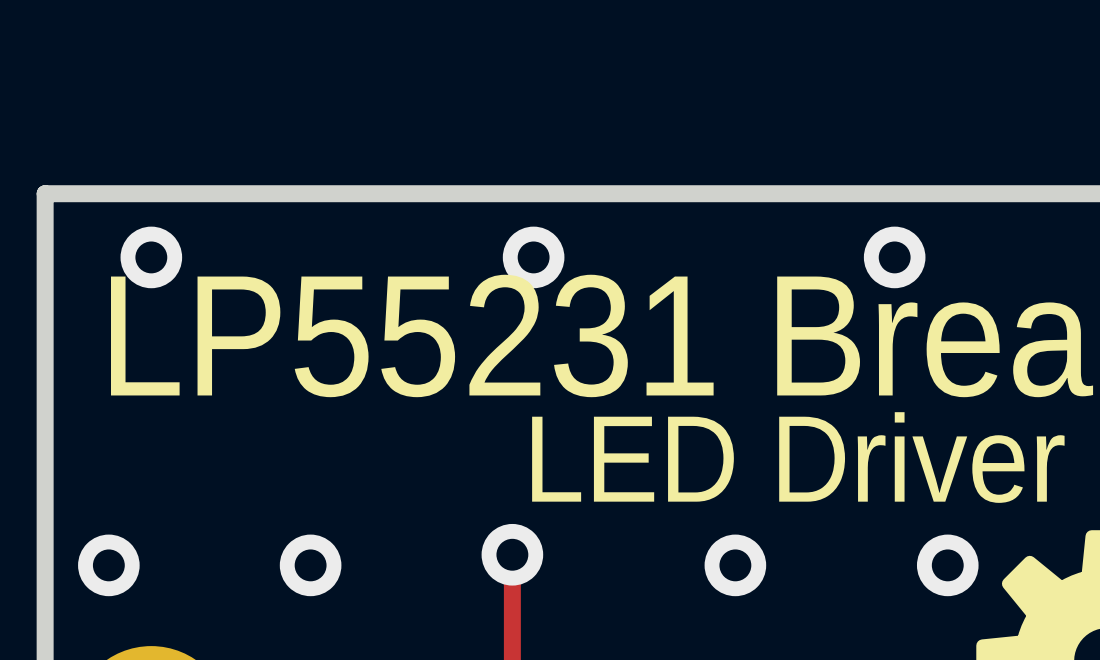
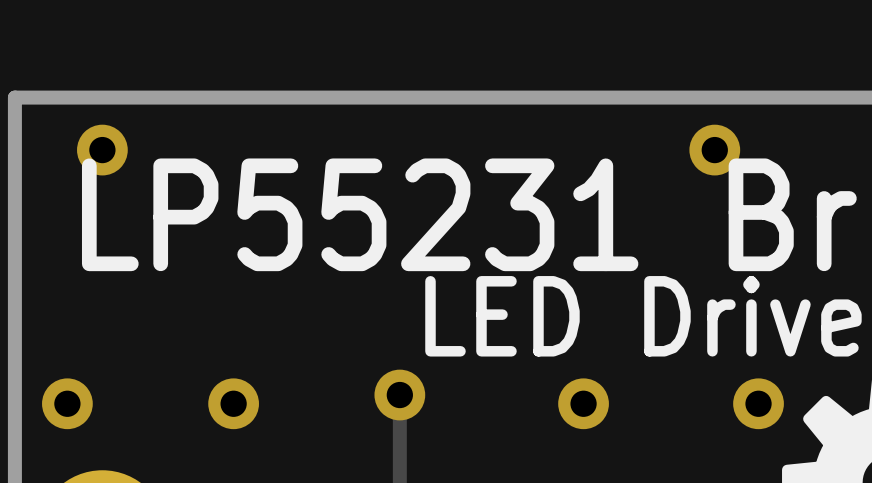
via: (533, 257) -> none

